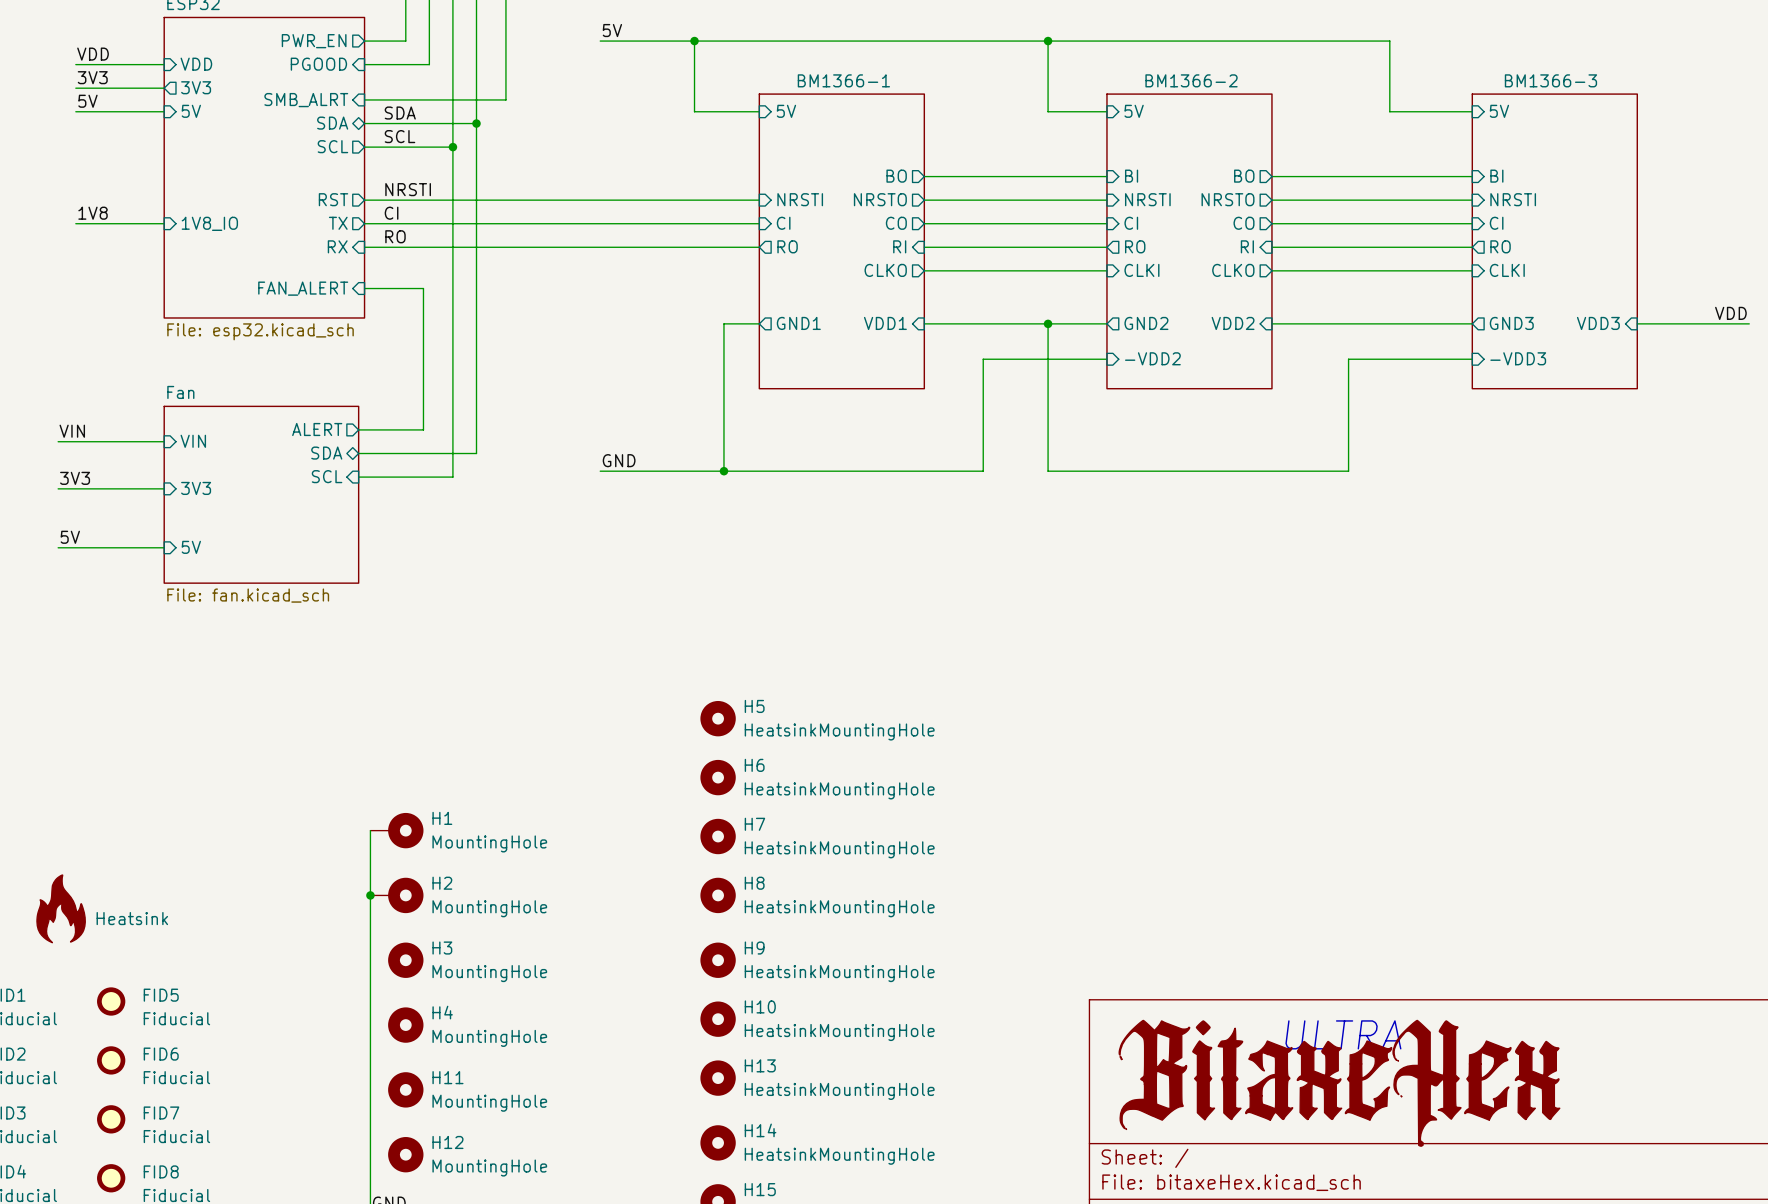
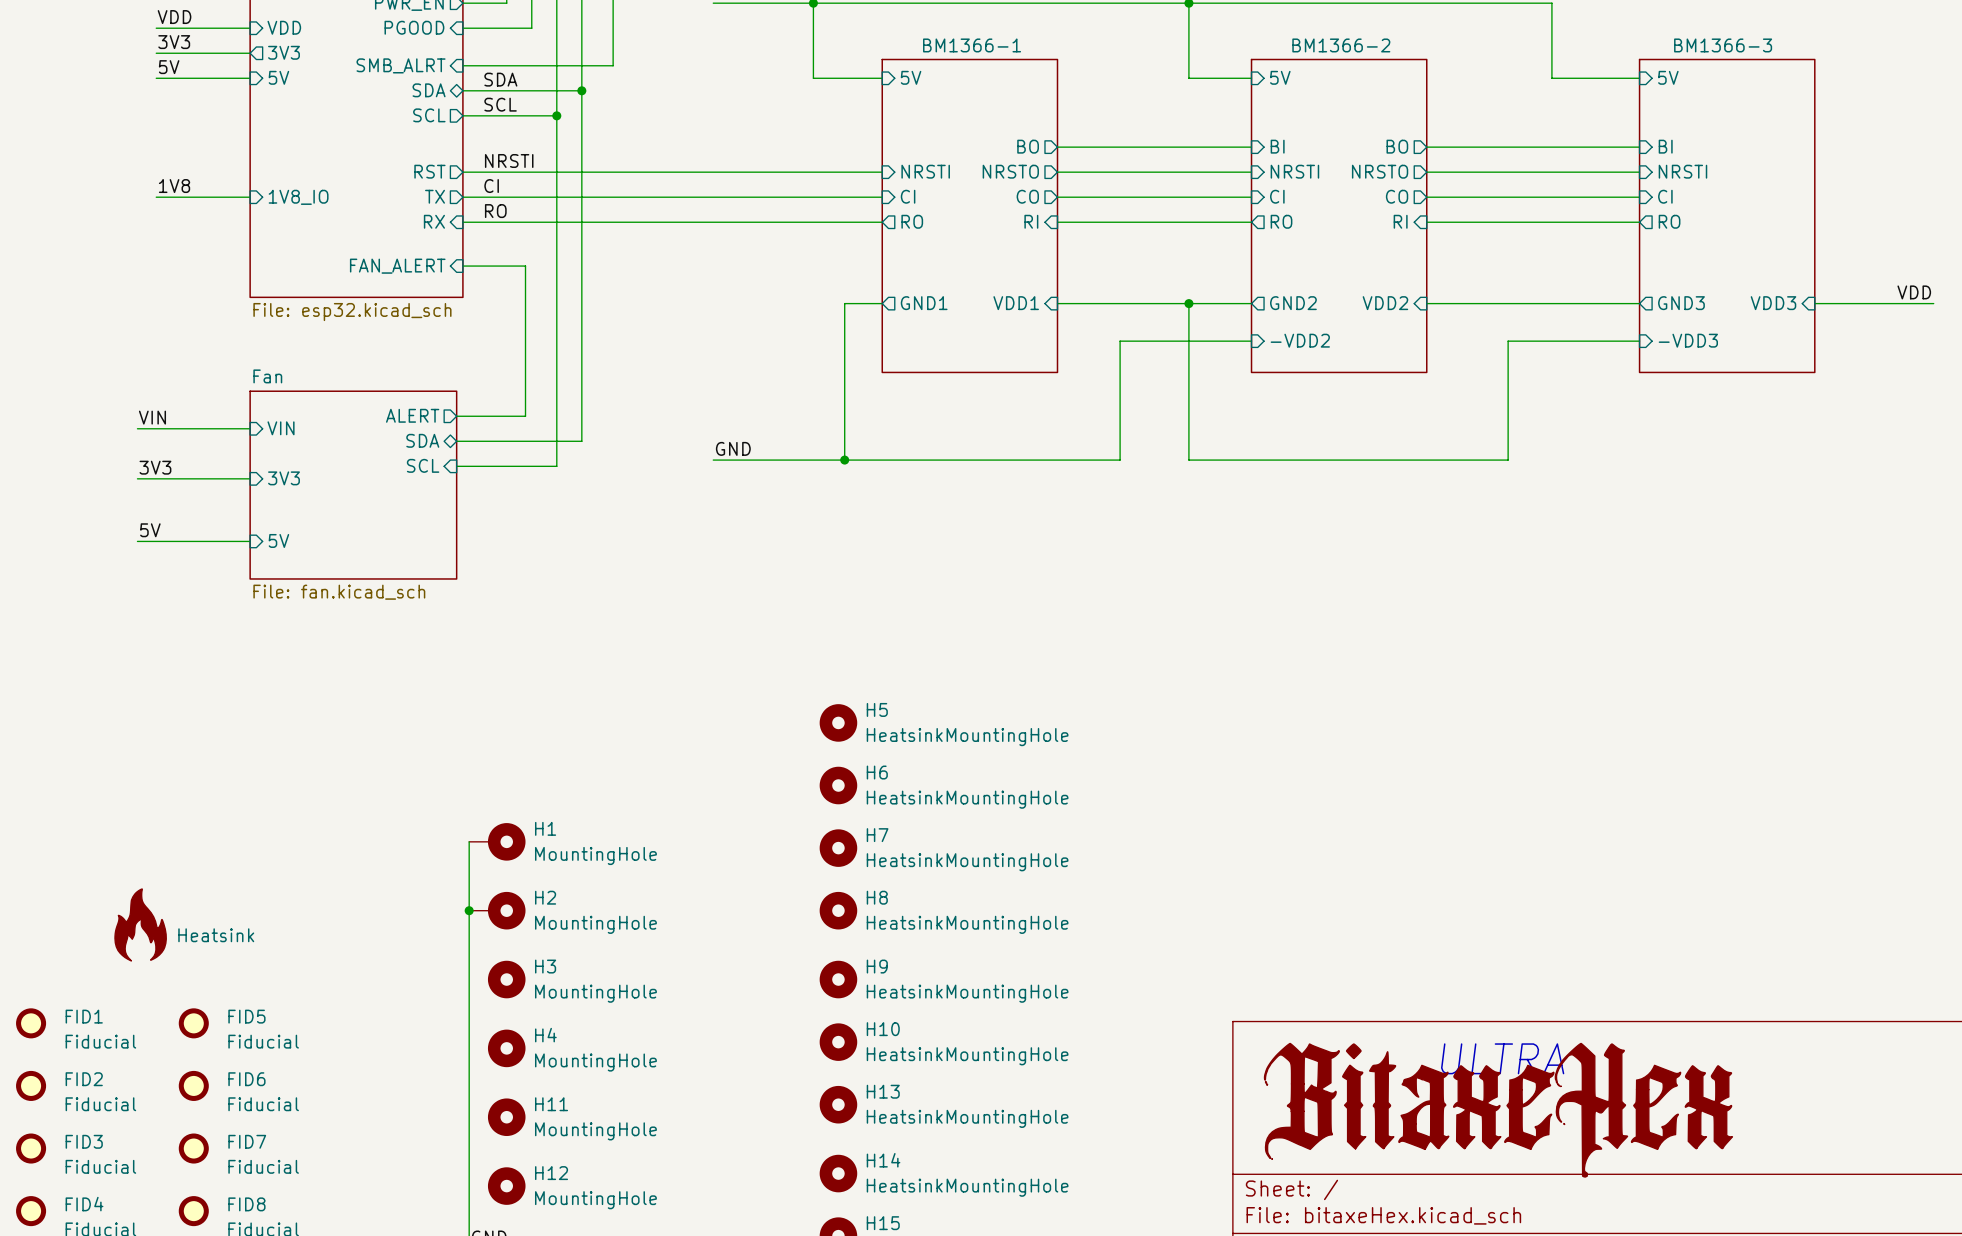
sheet pin: CLKO (885, 270) -> none
wire: (924, 270) (1106, 270) -> none
sheet pin: CLKI (1141, 270) -> none
sheet pin: CLKO (1233, 270) -> none
wire: (1271, 270) (1472, 270) -> none
sheet pin: CLKI (1507, 270) -> none

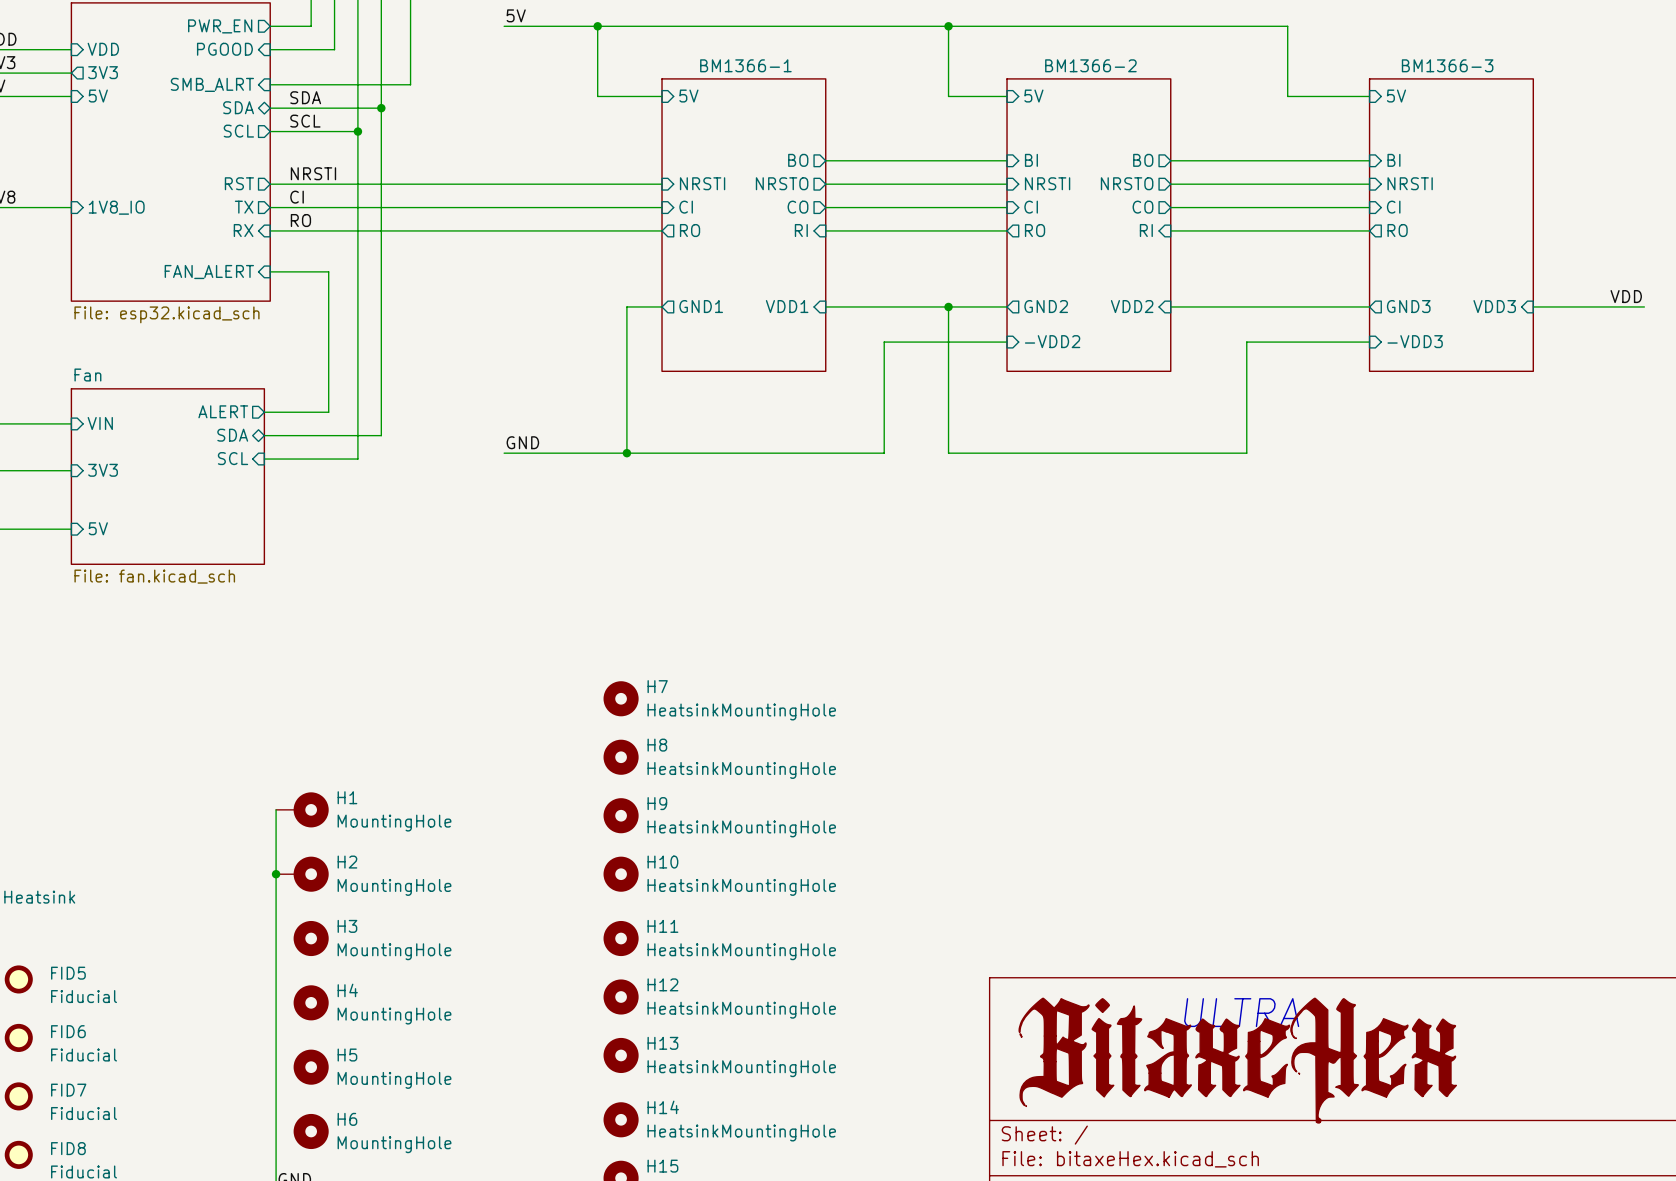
H5 name: H5 (877, 709) -> H7 (657, 686)
H6 name: H6 (877, 772) -> H8 (657, 745)
H7 name: H7 (877, 835) -> H9 (657, 803)
H8 name: H8 (877, 897) -> H10 (662, 862)
H9 name: H9 (877, 966) -> H11 (662, 926)
H10 name: H10 (883, 1029) -> H12 (662, 984)
H11 name: H11 (551, 1104) -> H5 (347, 1055)
H12 name: H12 (551, 1173) -> H6 (347, 1119)

